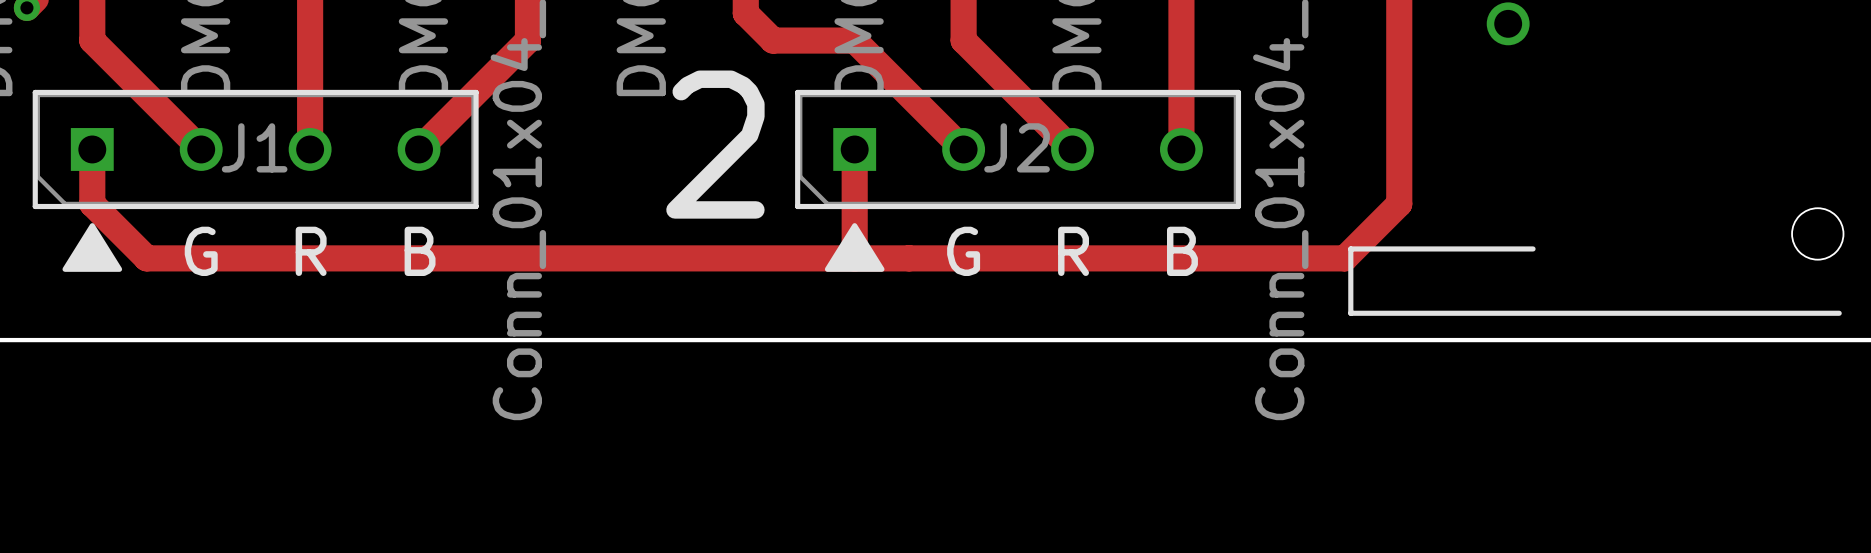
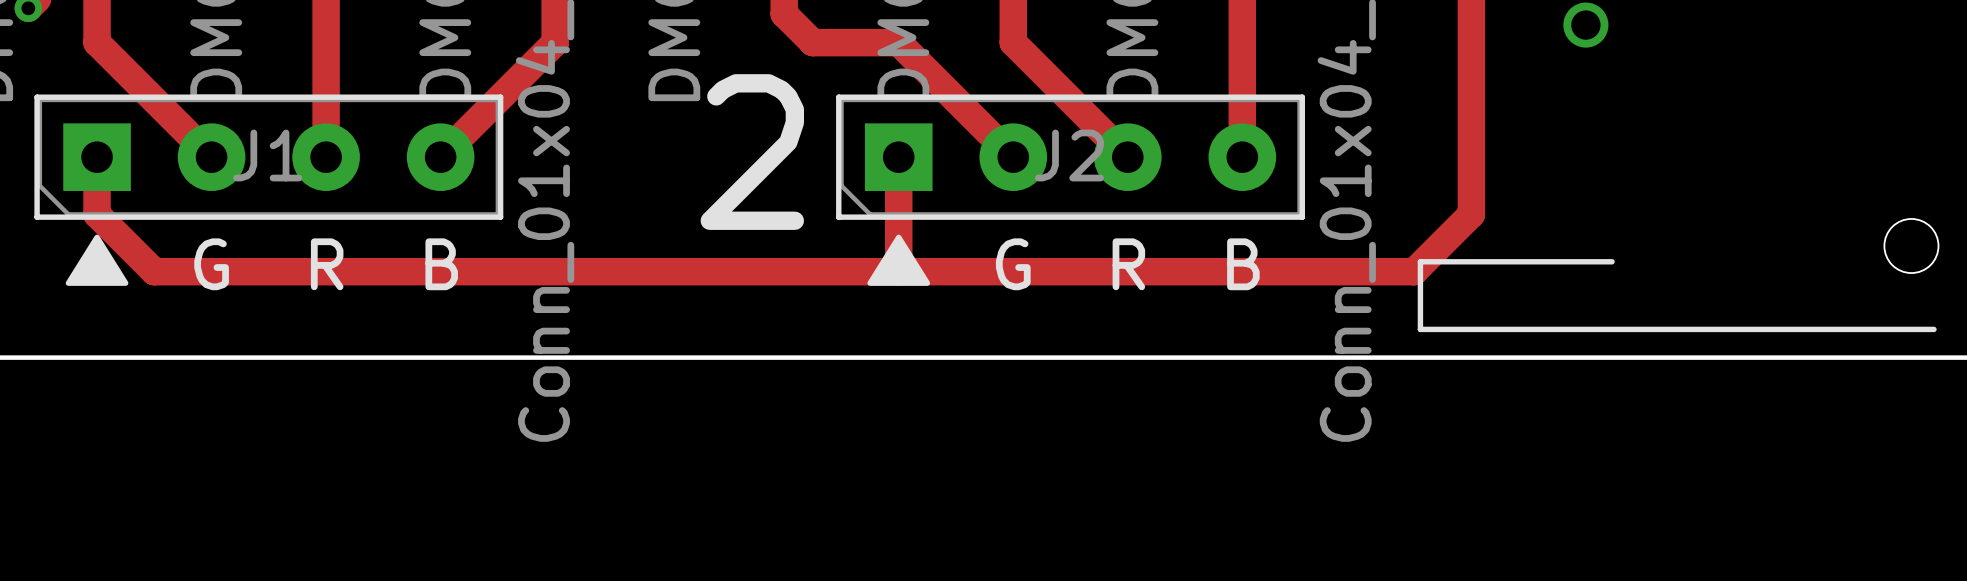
J1 footprint: [32, 89, 479, 272] -> [34, 94, 504, 286]
J2 footprint: [795, 89, 1242, 272] -> [836, 94, 1305, 286]

